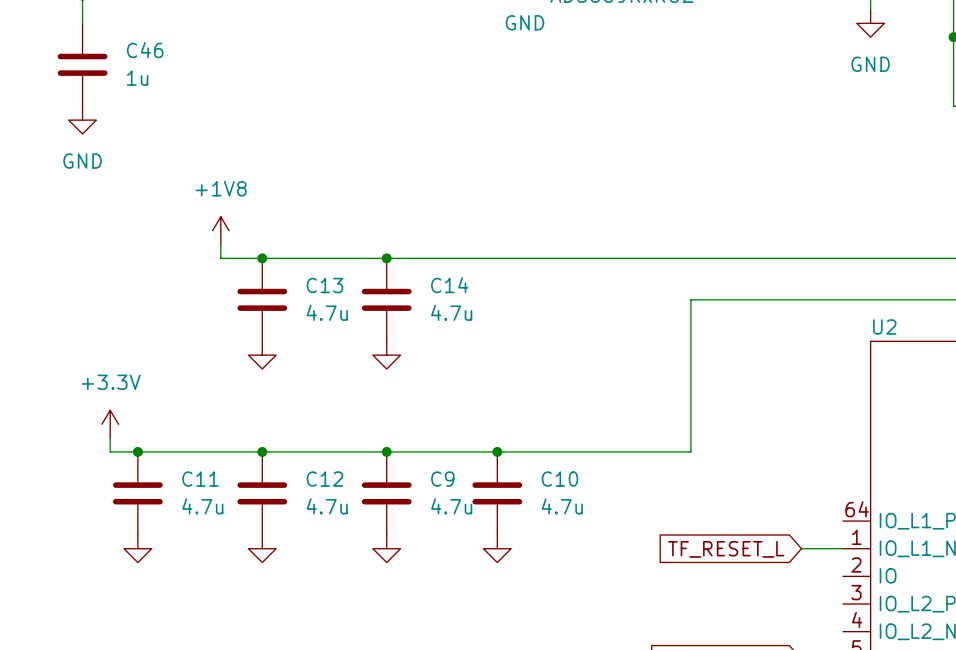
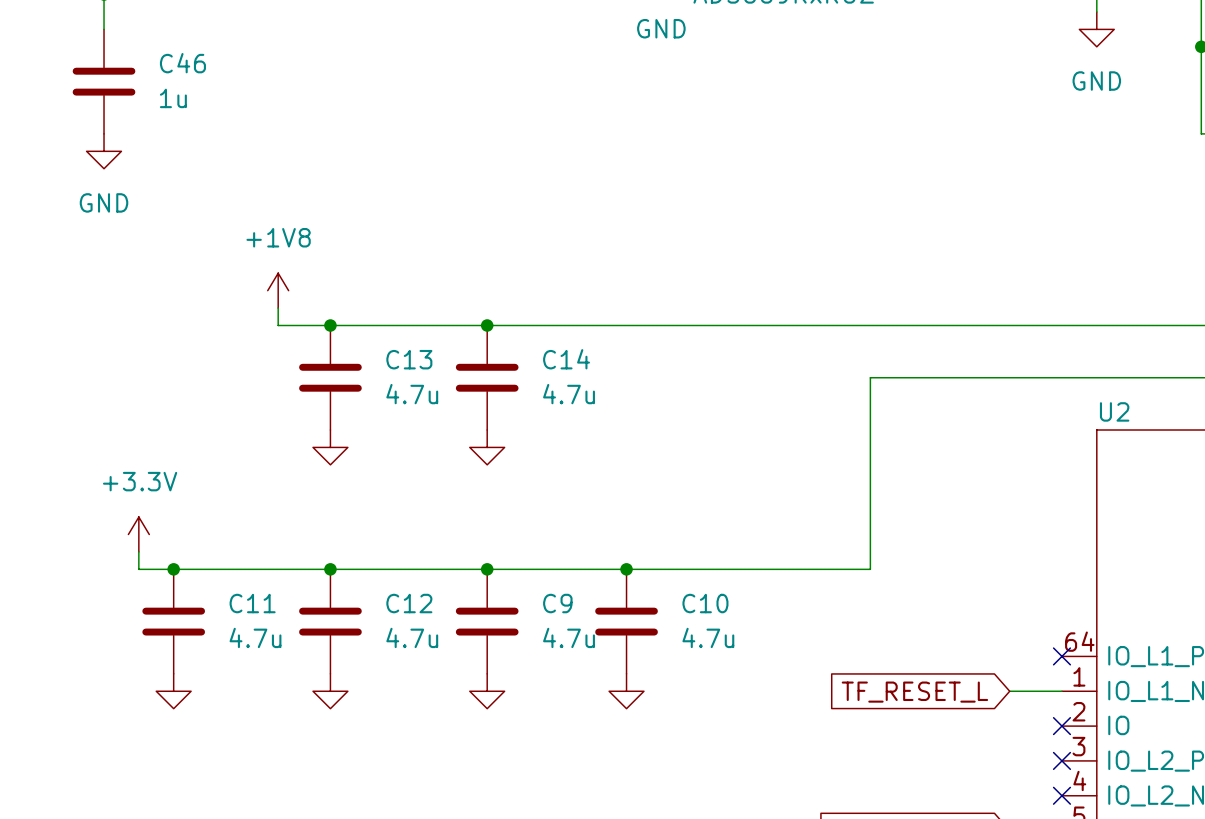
no-connect mark: none -> (1061, 656)
no-connect mark: none -> (1061, 726)
no-connect mark: none -> (1061, 760)
no-connect mark: none -> (1061, 795)

